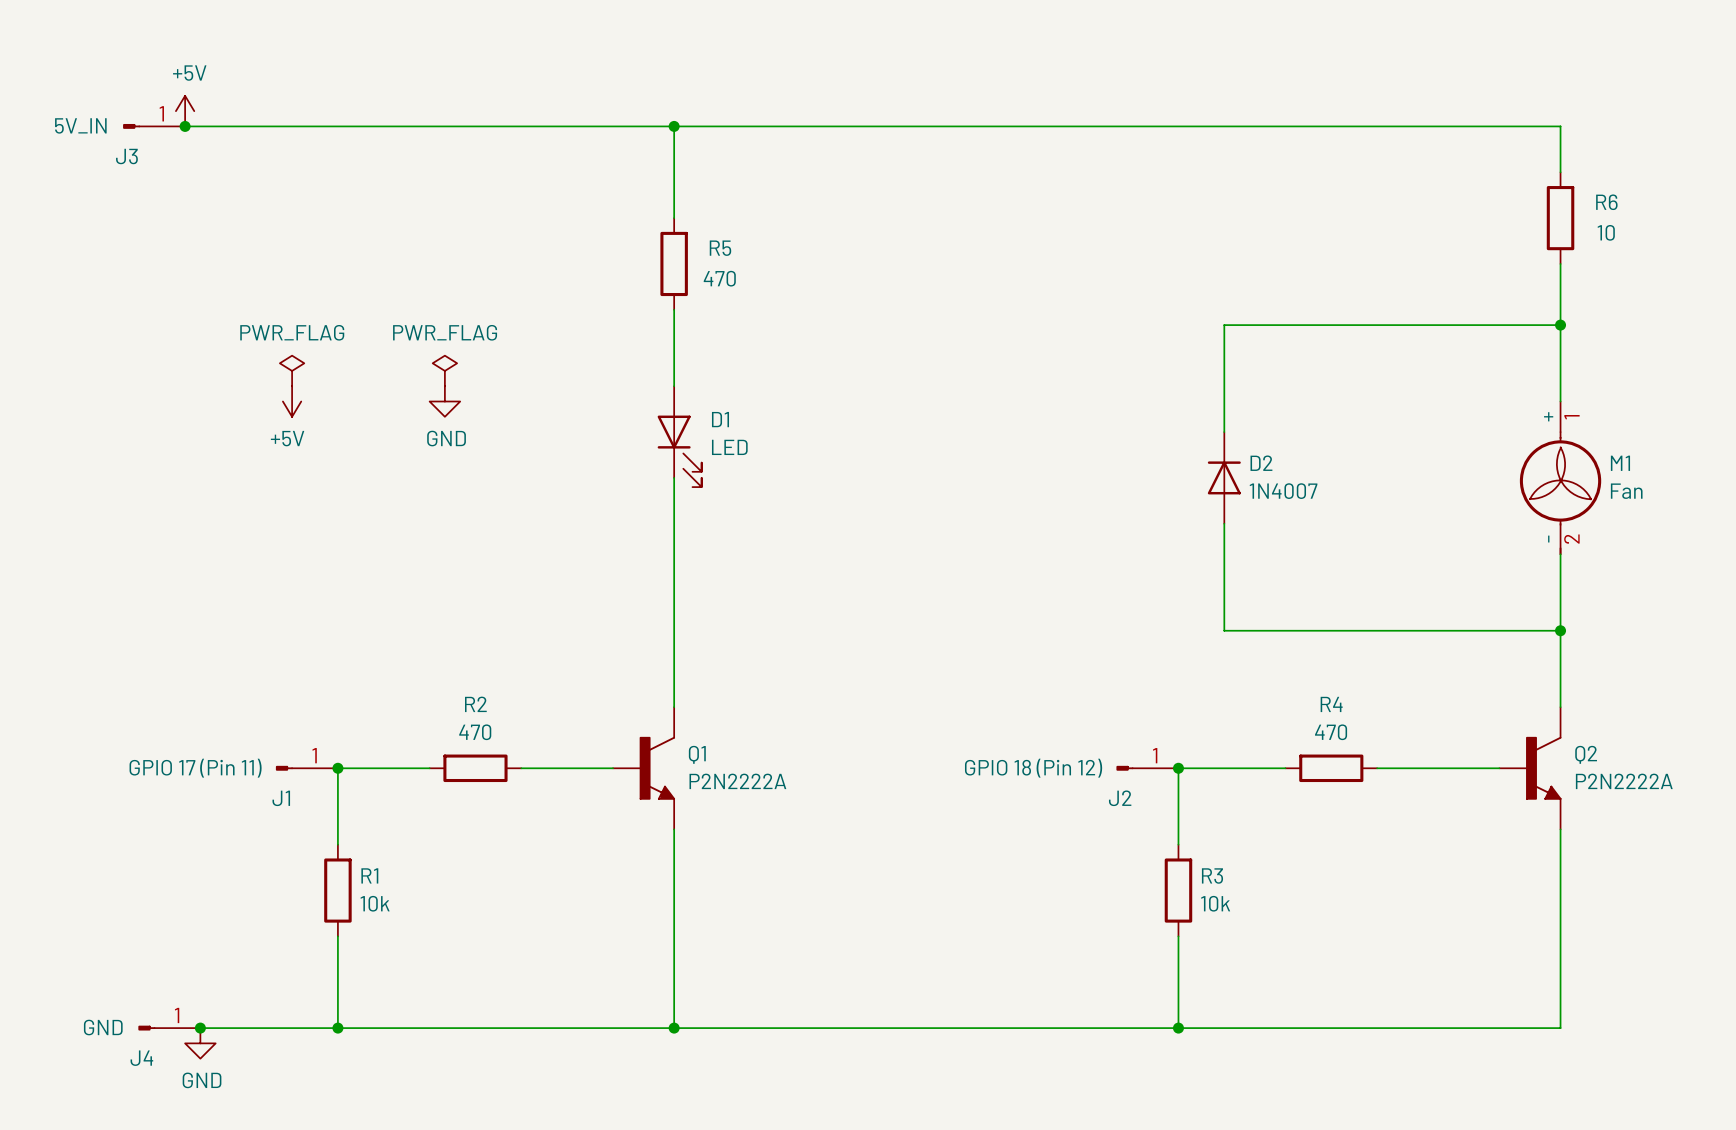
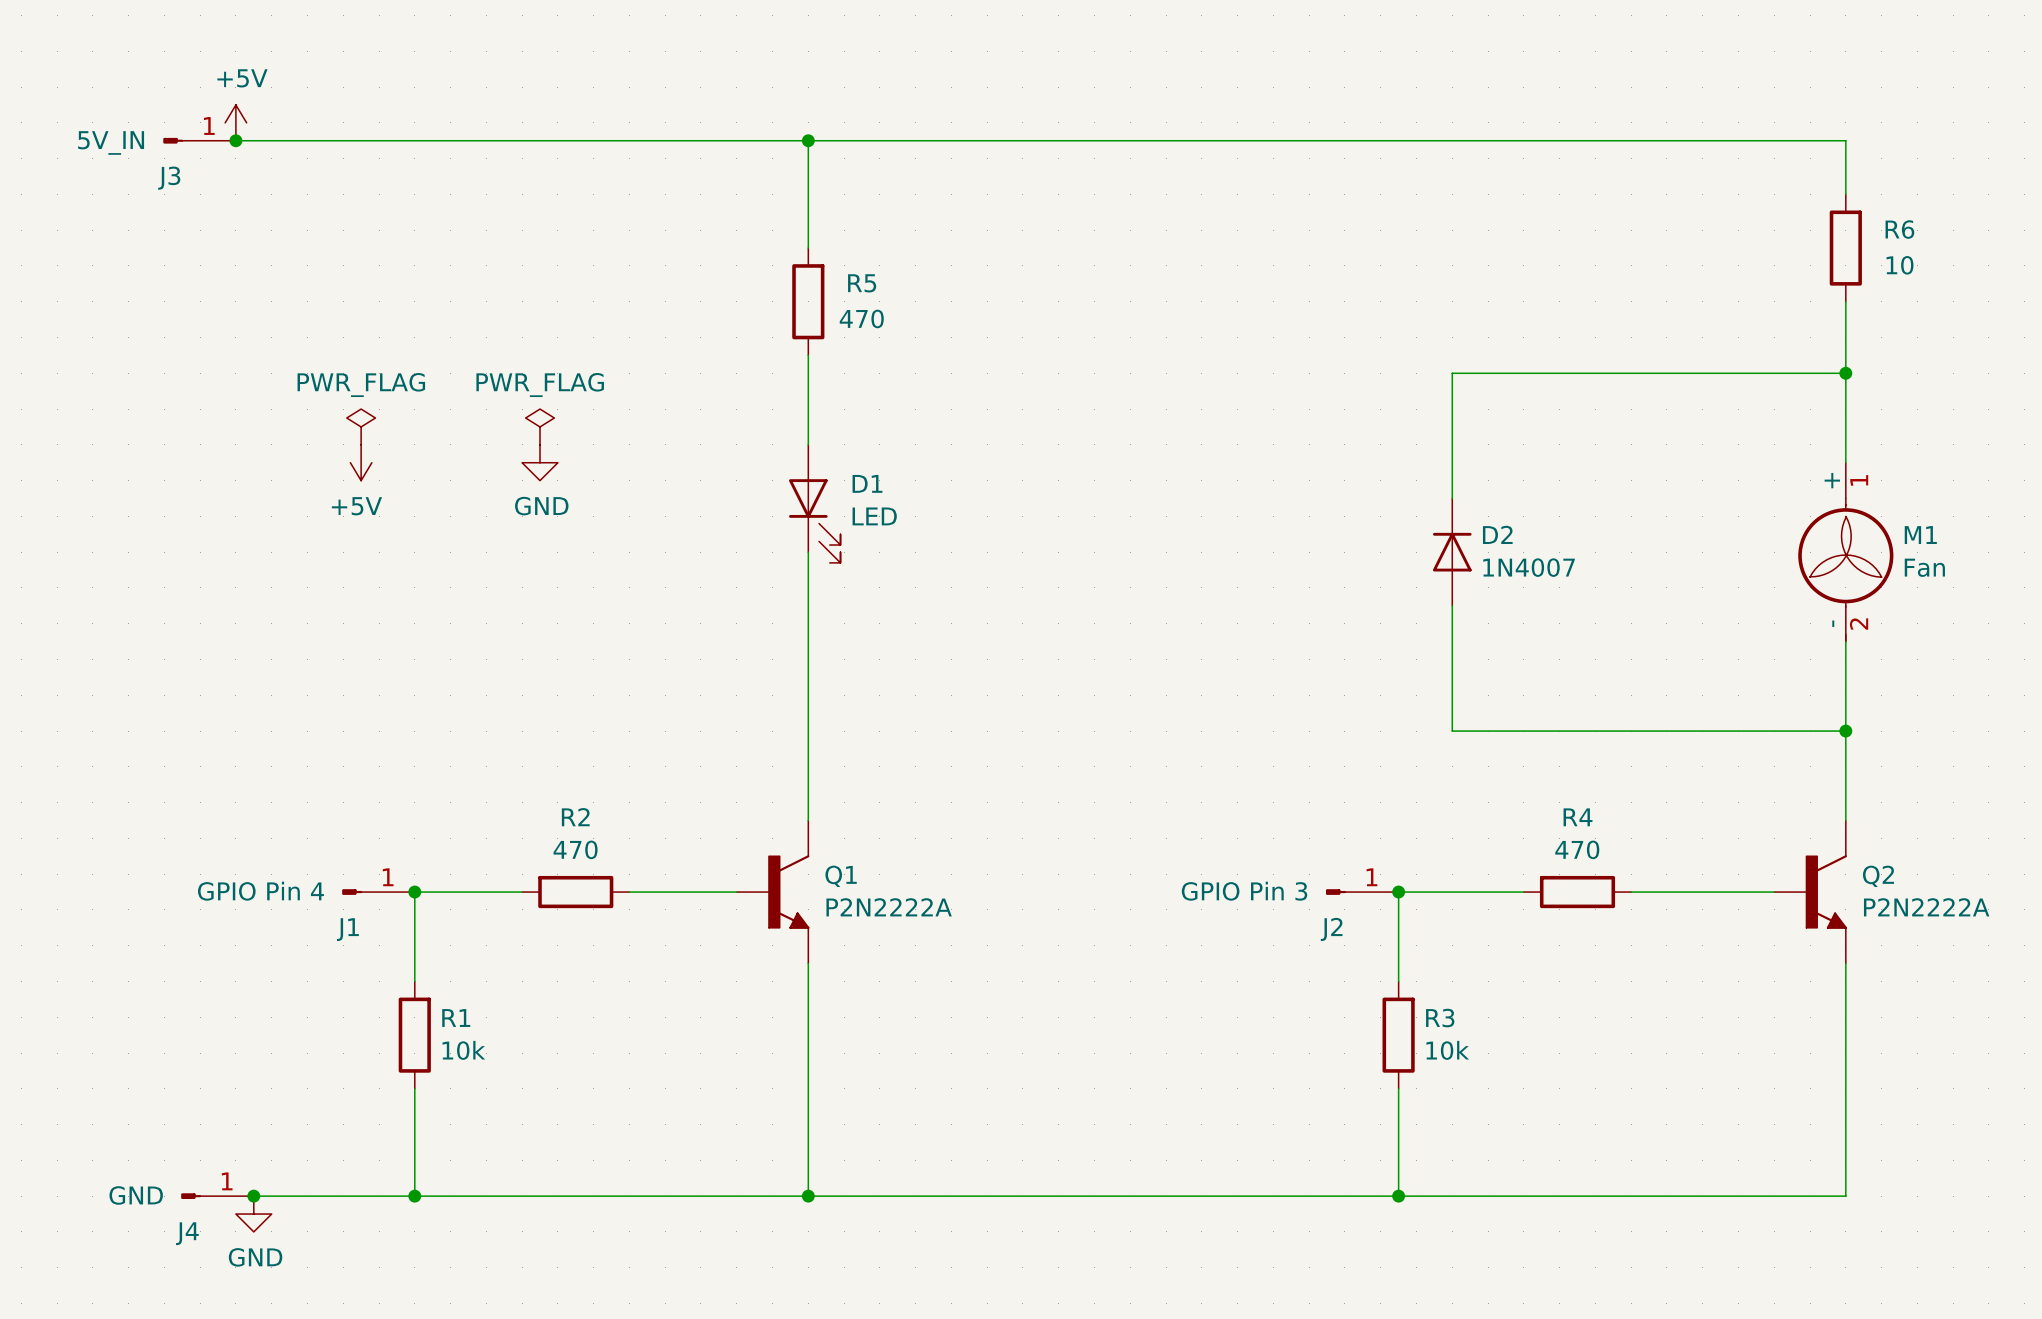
J1 value: GPIO 17 (Pin 11) (195, 768) -> GPIO Pin 4 (260, 891)
J2 value: GPIO 18 (Pin 12) (1033, 768) -> GPIO Pin 3 (1244, 891)

